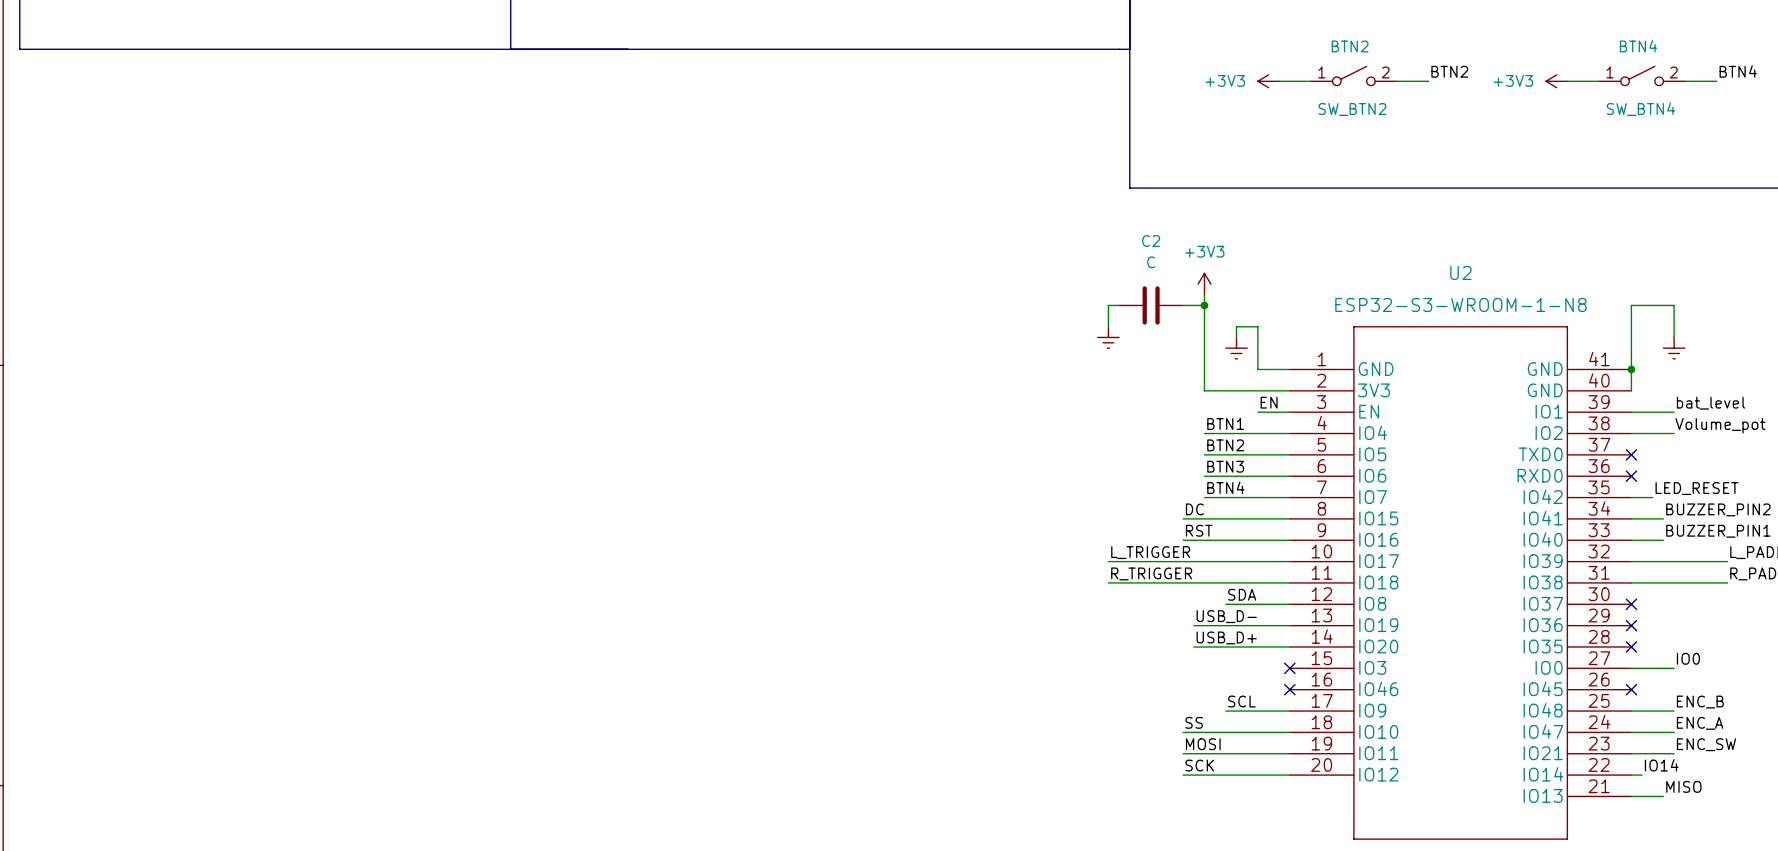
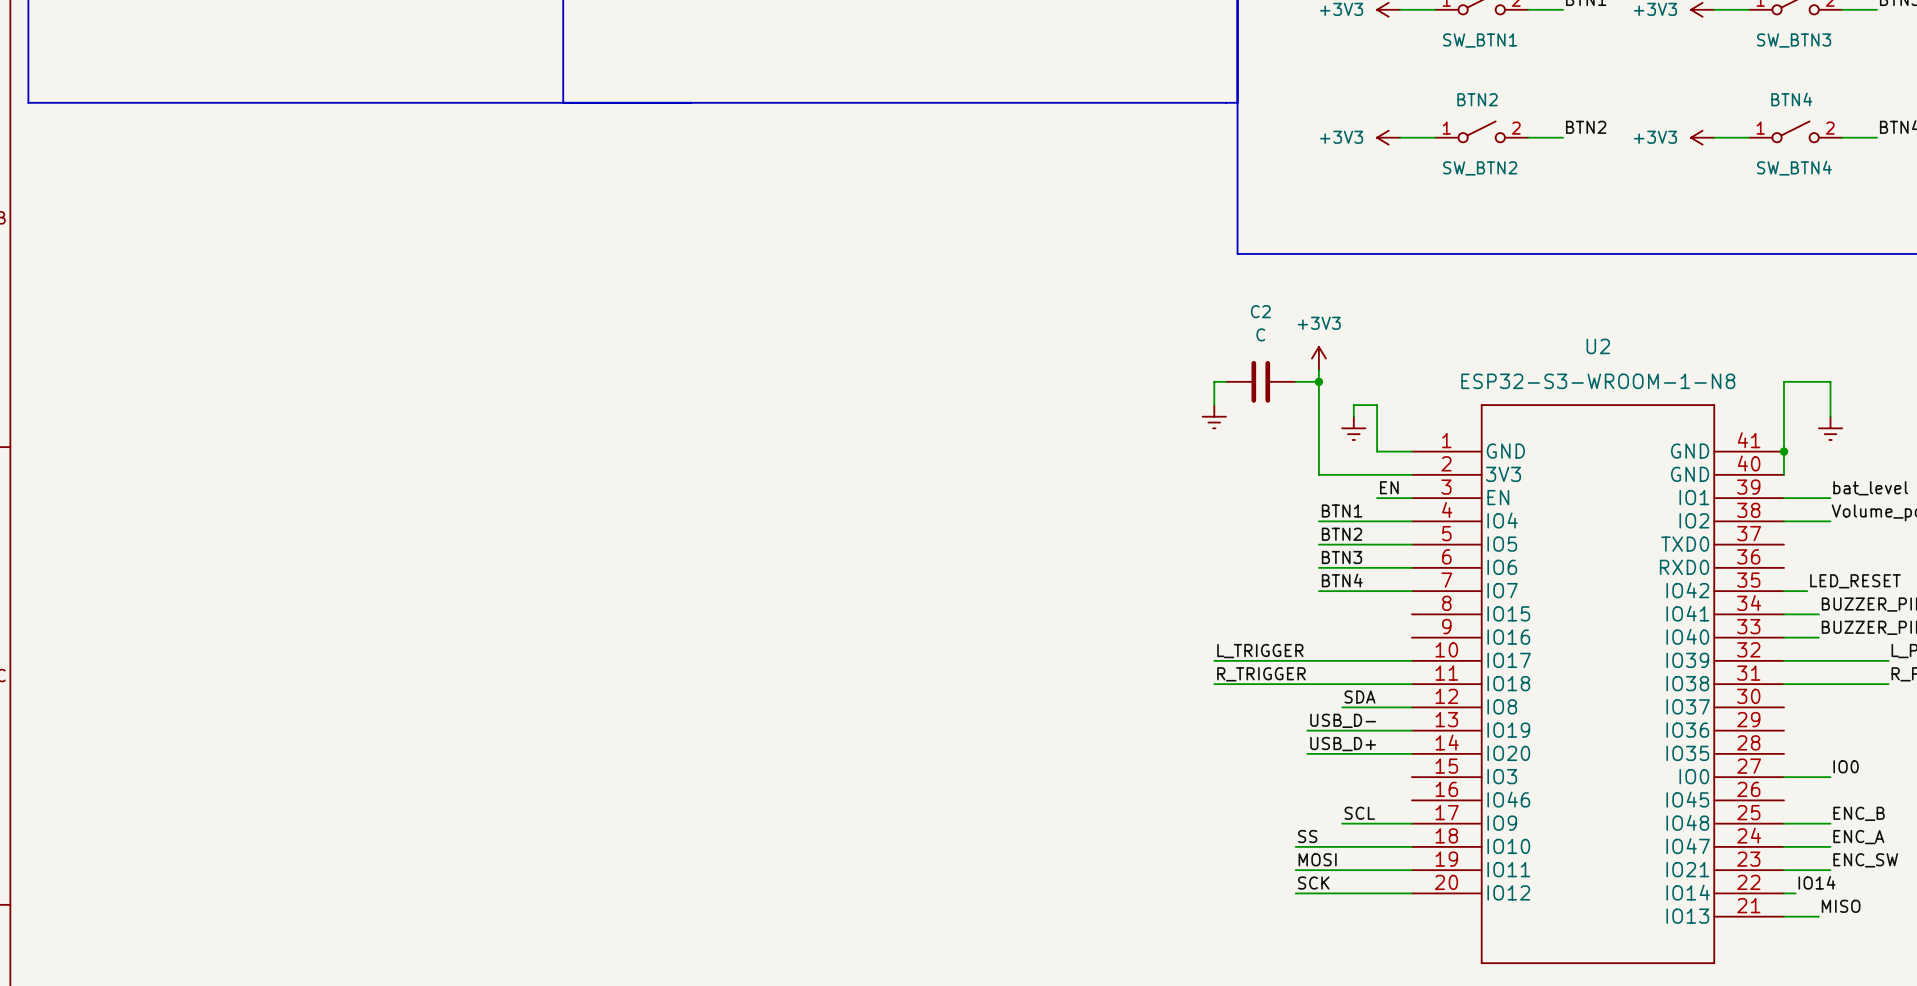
no-connect mark: (1631, 454) -> none
no-connect mark: (1631, 476) -> none
label: DC (1194, 509) -> none
wire: (1183, 518) (1289, 518) -> none
label: RST (1199, 530) -> none
wire: (1183, 540) (1289, 540) -> none
no-connect mark: (1631, 604) -> none
no-connect mark: (1631, 625) -> none
no-connect mark: (1631, 646) -> none
no-connect mark: (1289, 668) -> none
no-connect mark: (1289, 689) -> none
no-connect mark: (1631, 689) -> none

